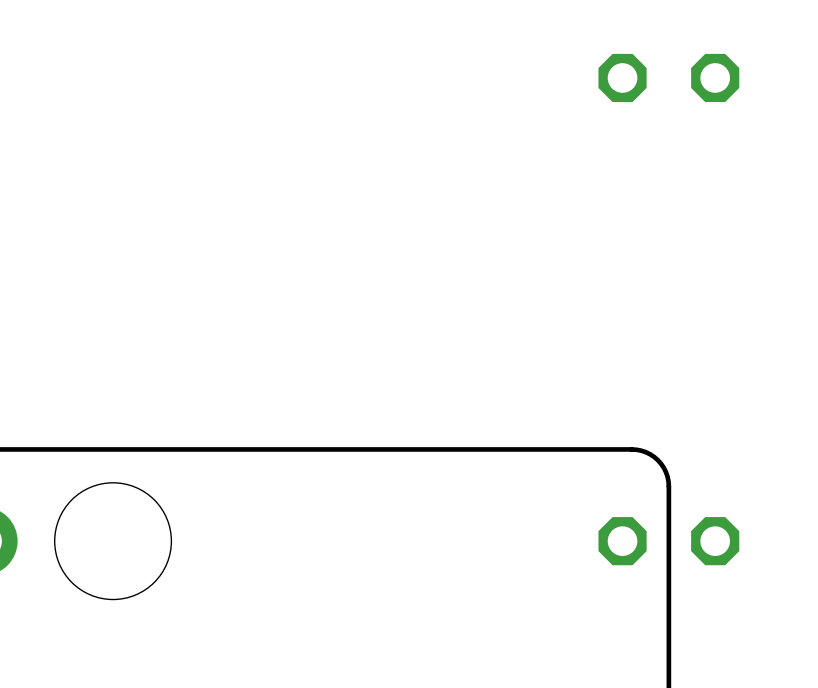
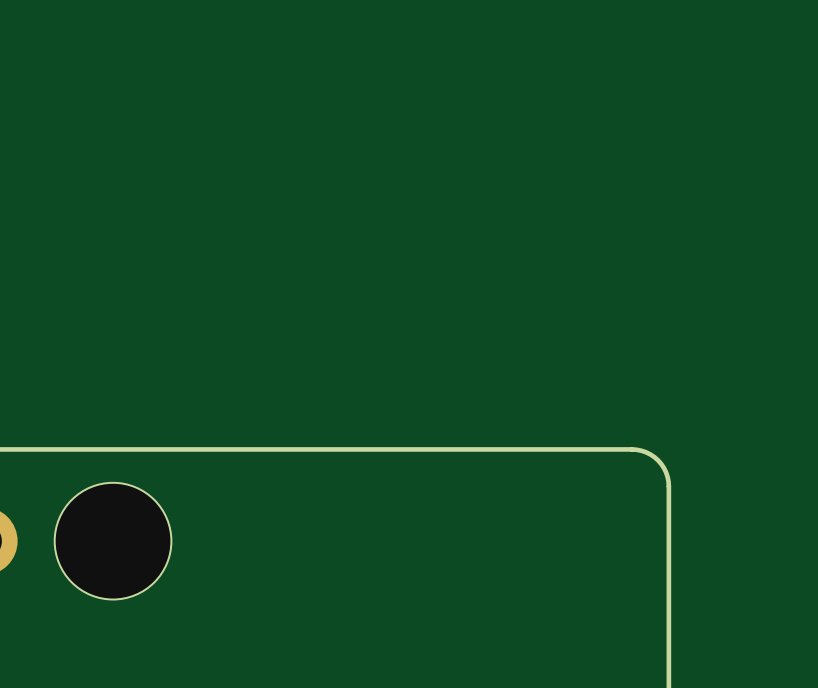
part: (668, 77) -> none
part: (668, 541) -> none

